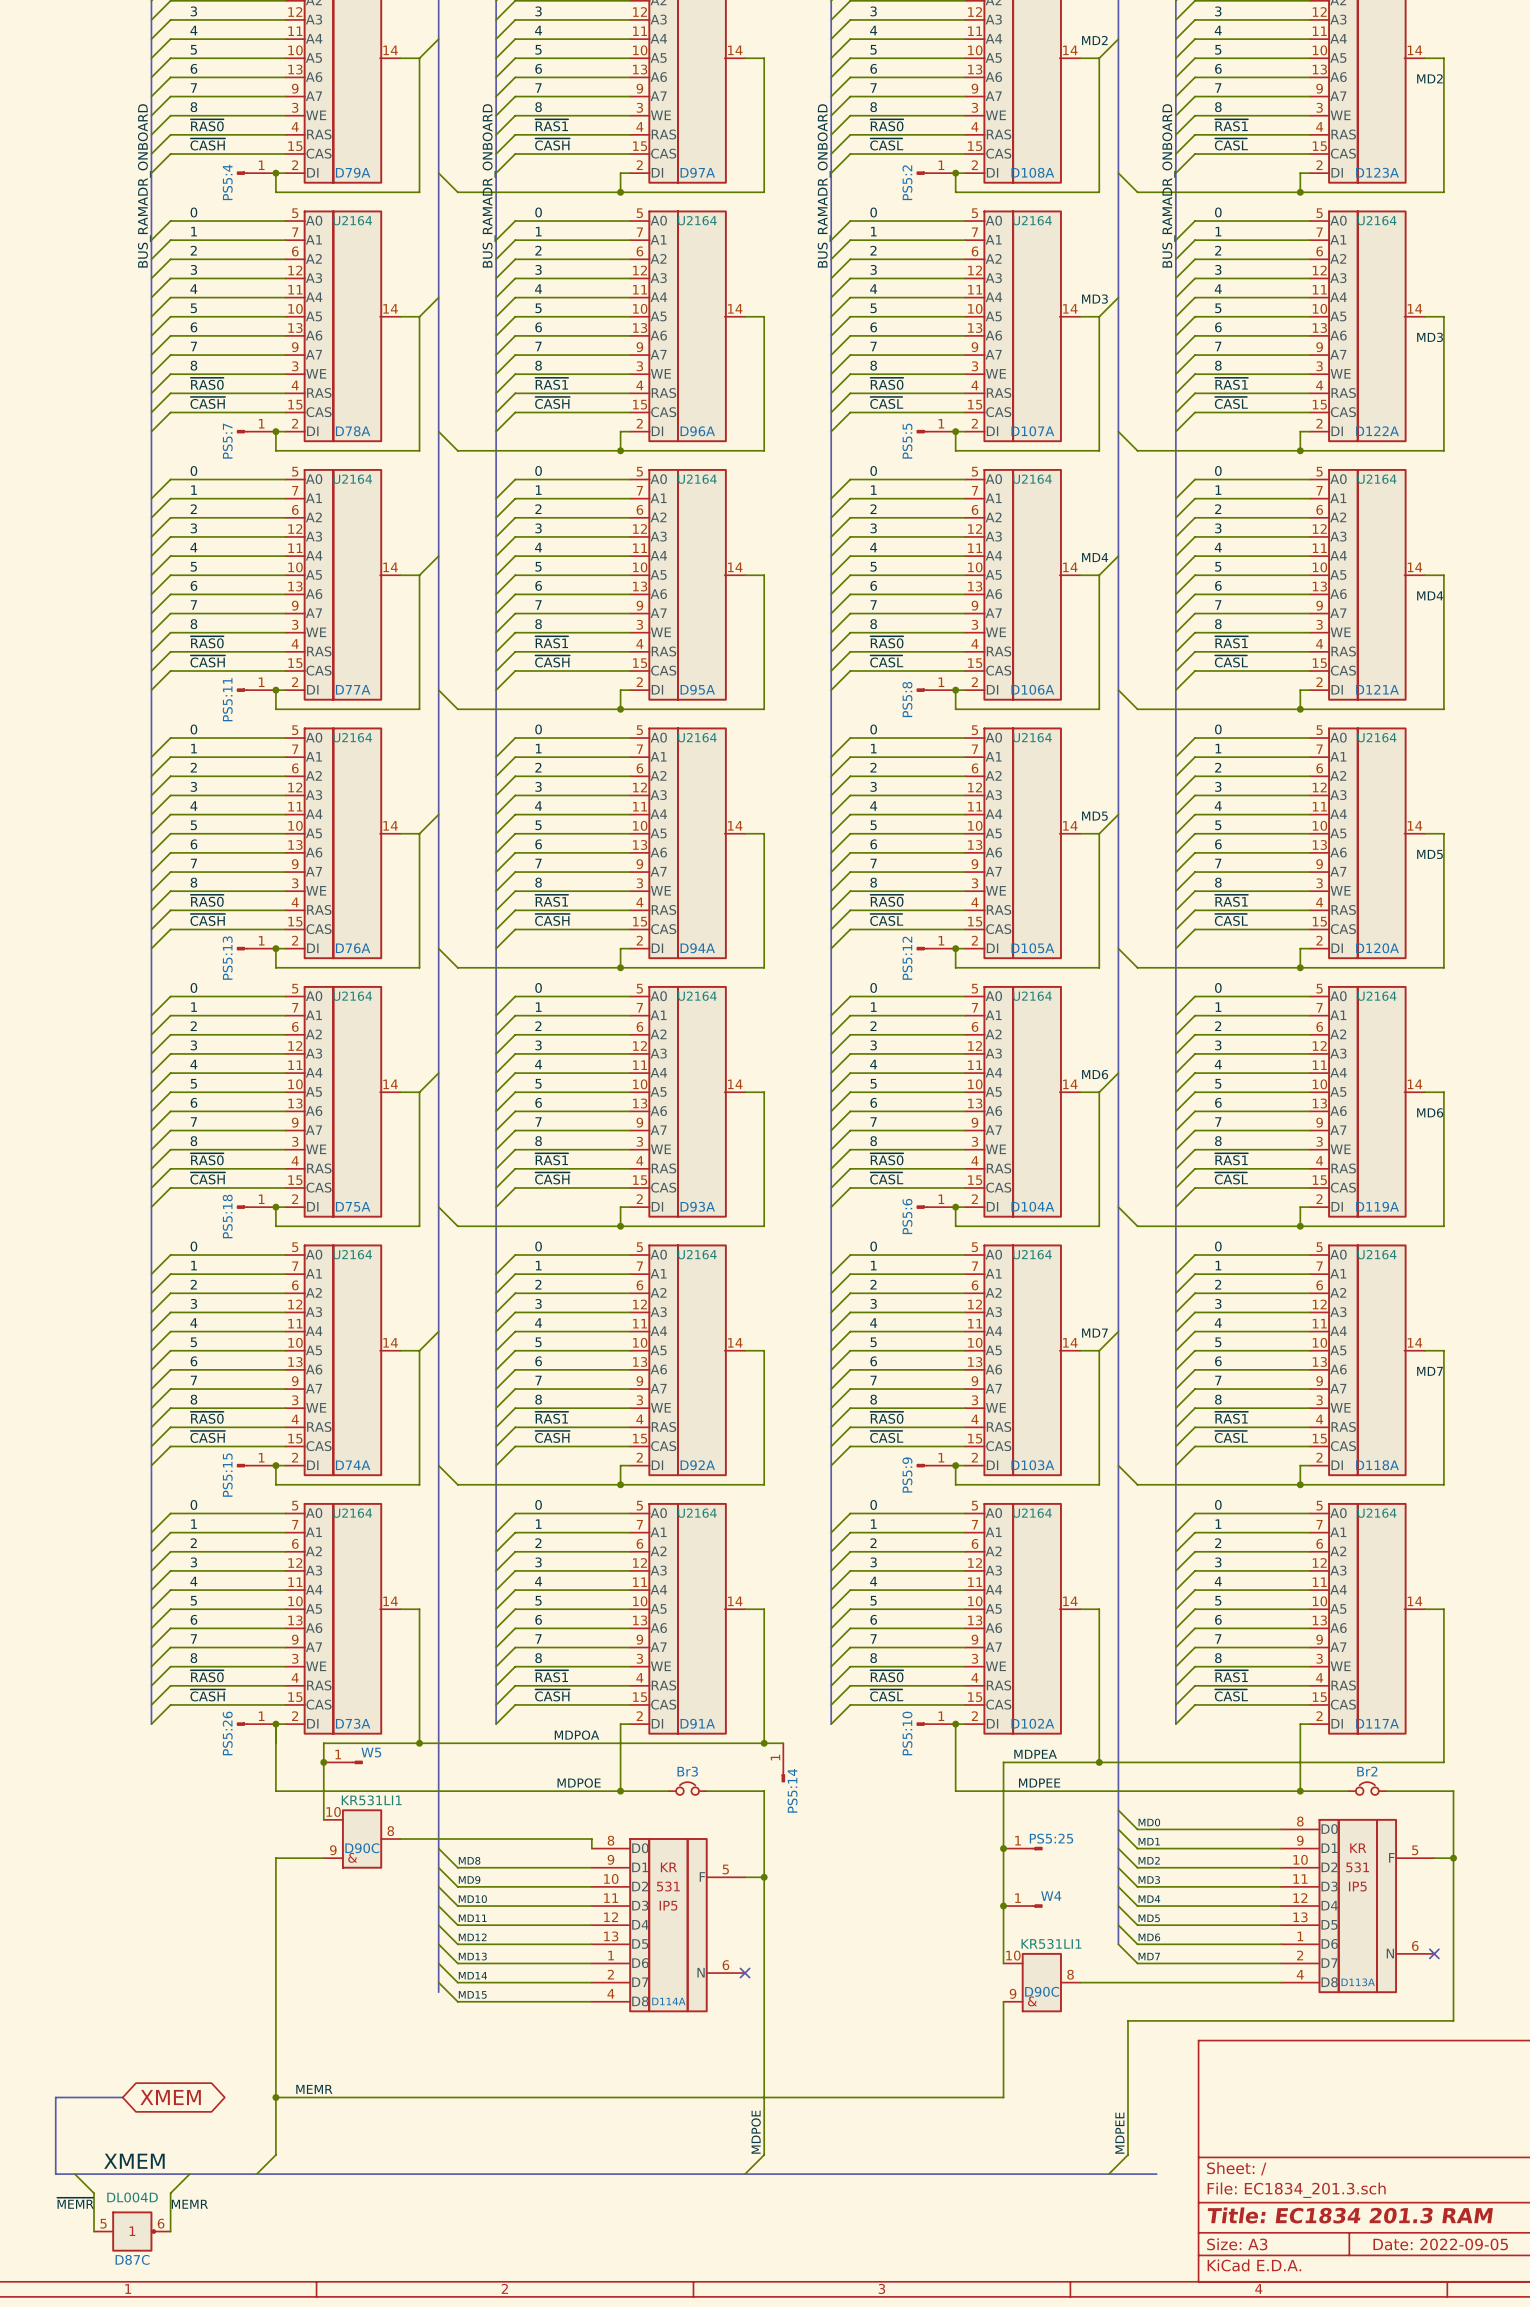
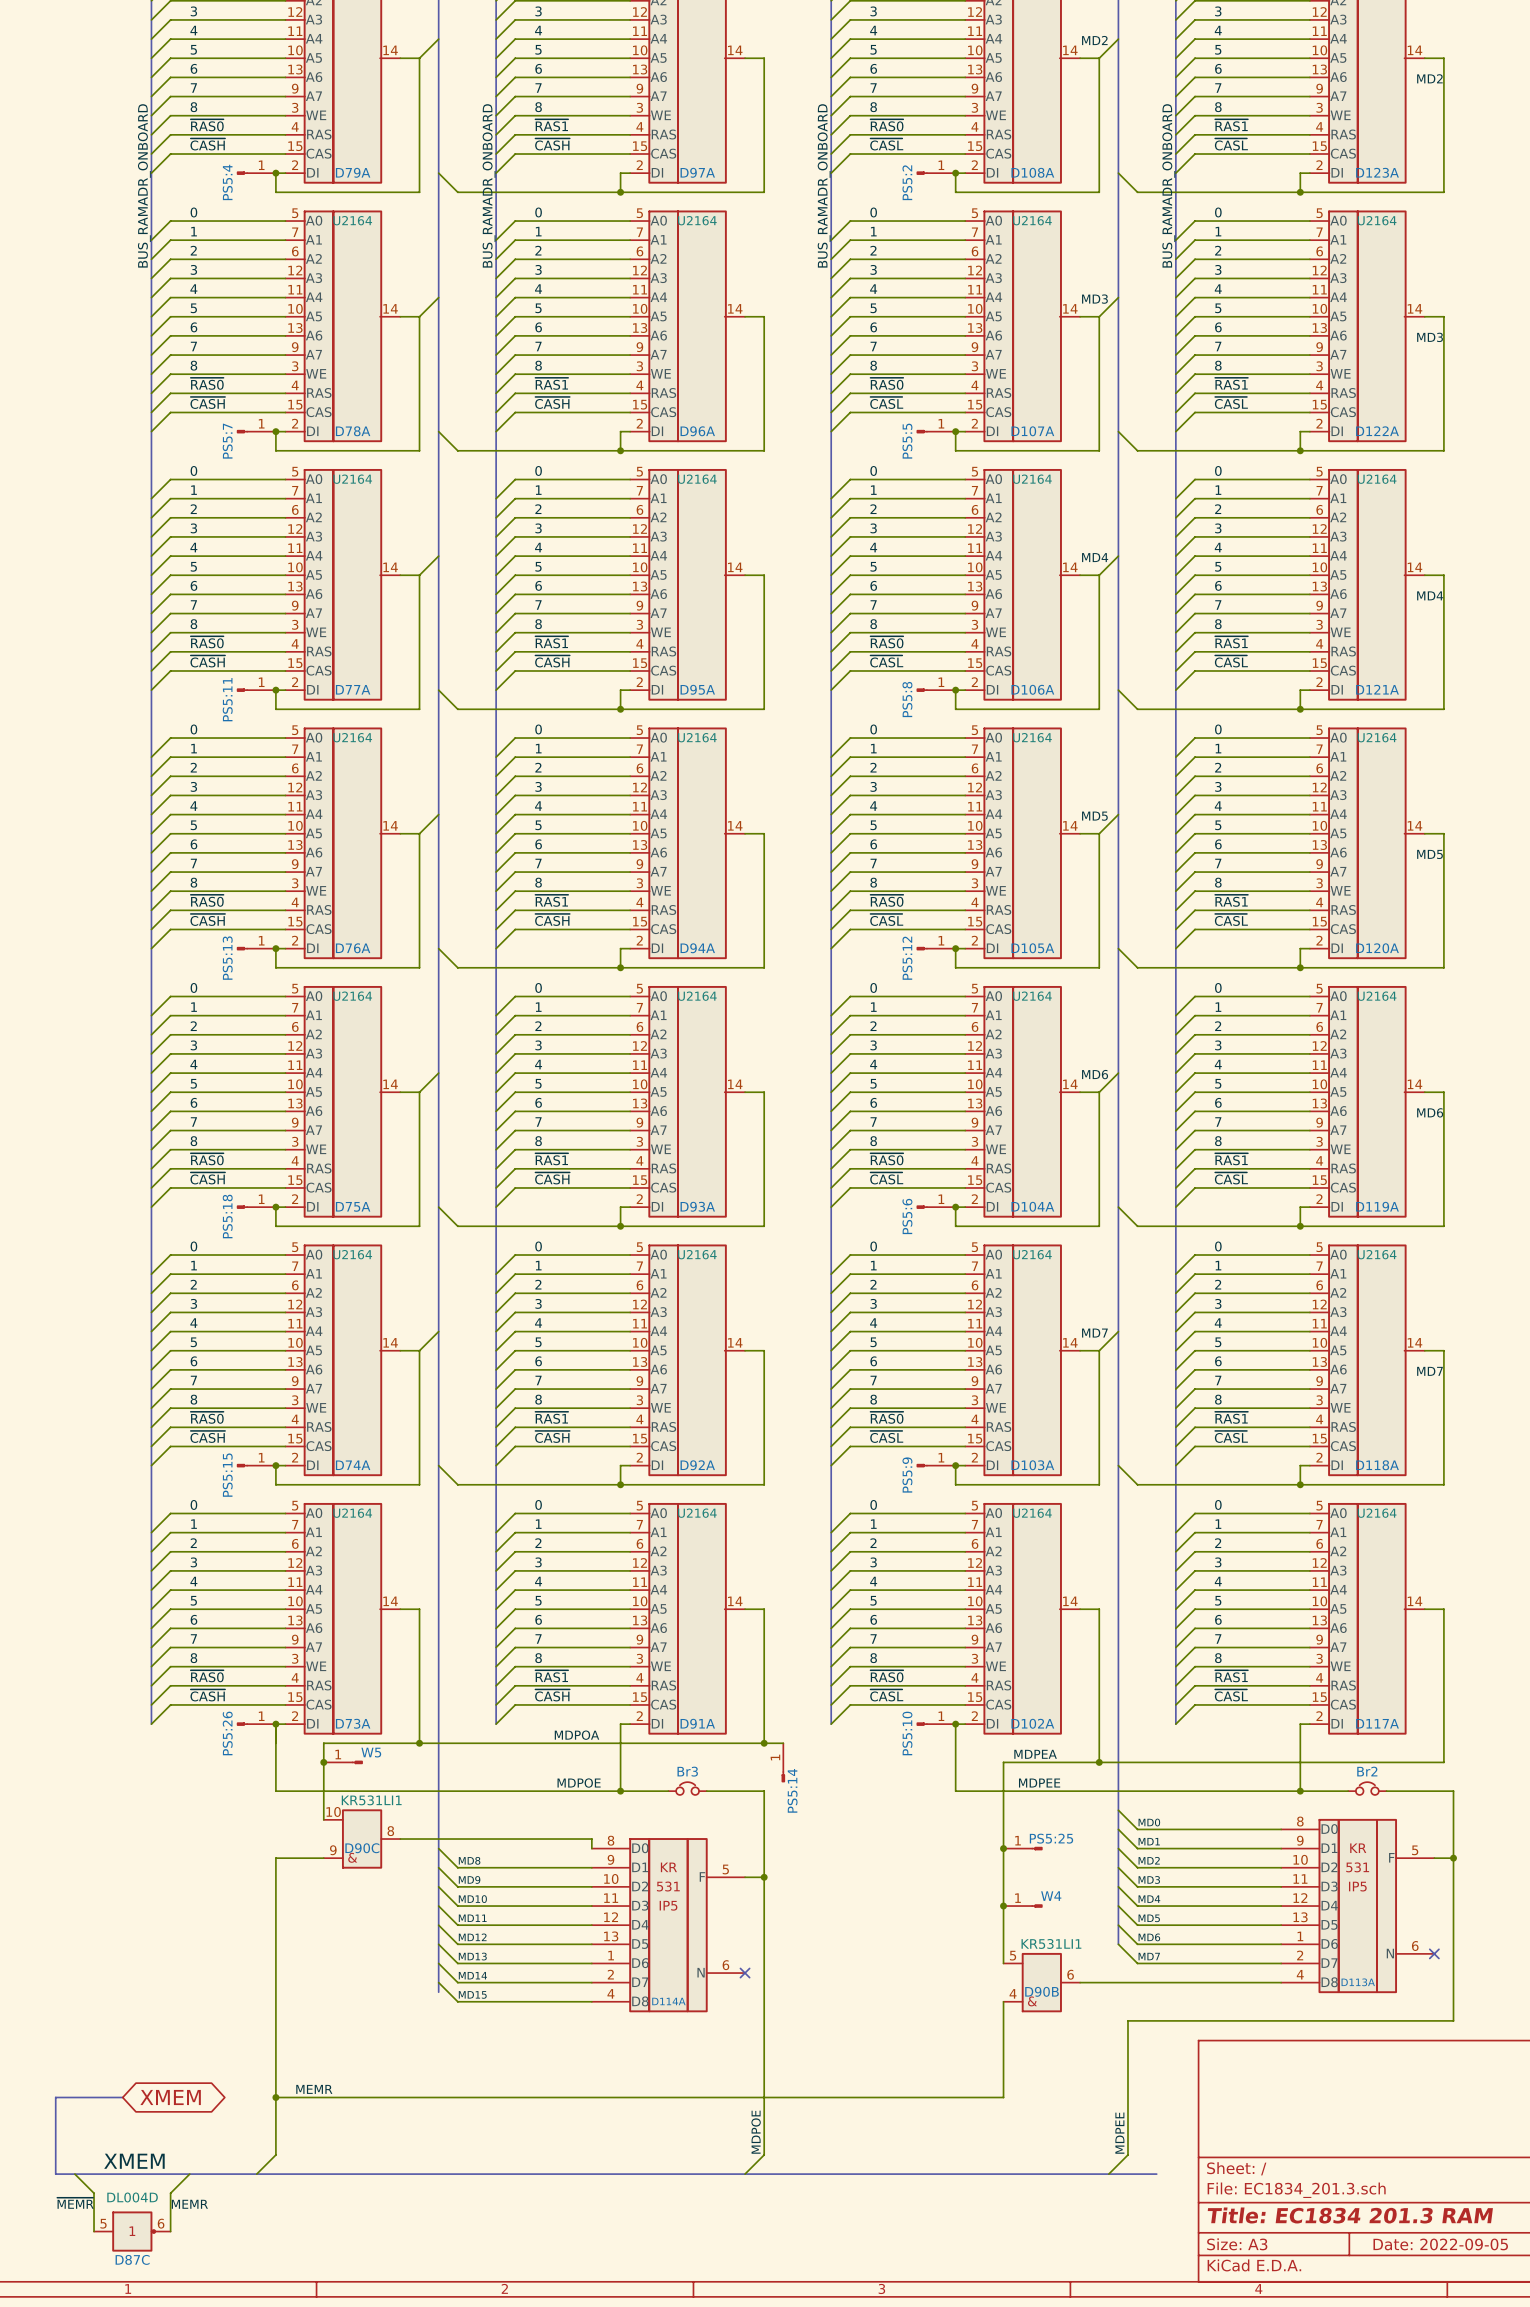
D90C pin number: 10 (1013, 1955) -> 5 (1013, 1955)
D90C pin number: 8 (1070, 1974) -> 6 (1070, 1974)
D90C name: D90C (1042, 1991) -> D90B (1042, 1991)
D90C pin number: 9 (1013, 1993) -> 4 (1013, 1993)

